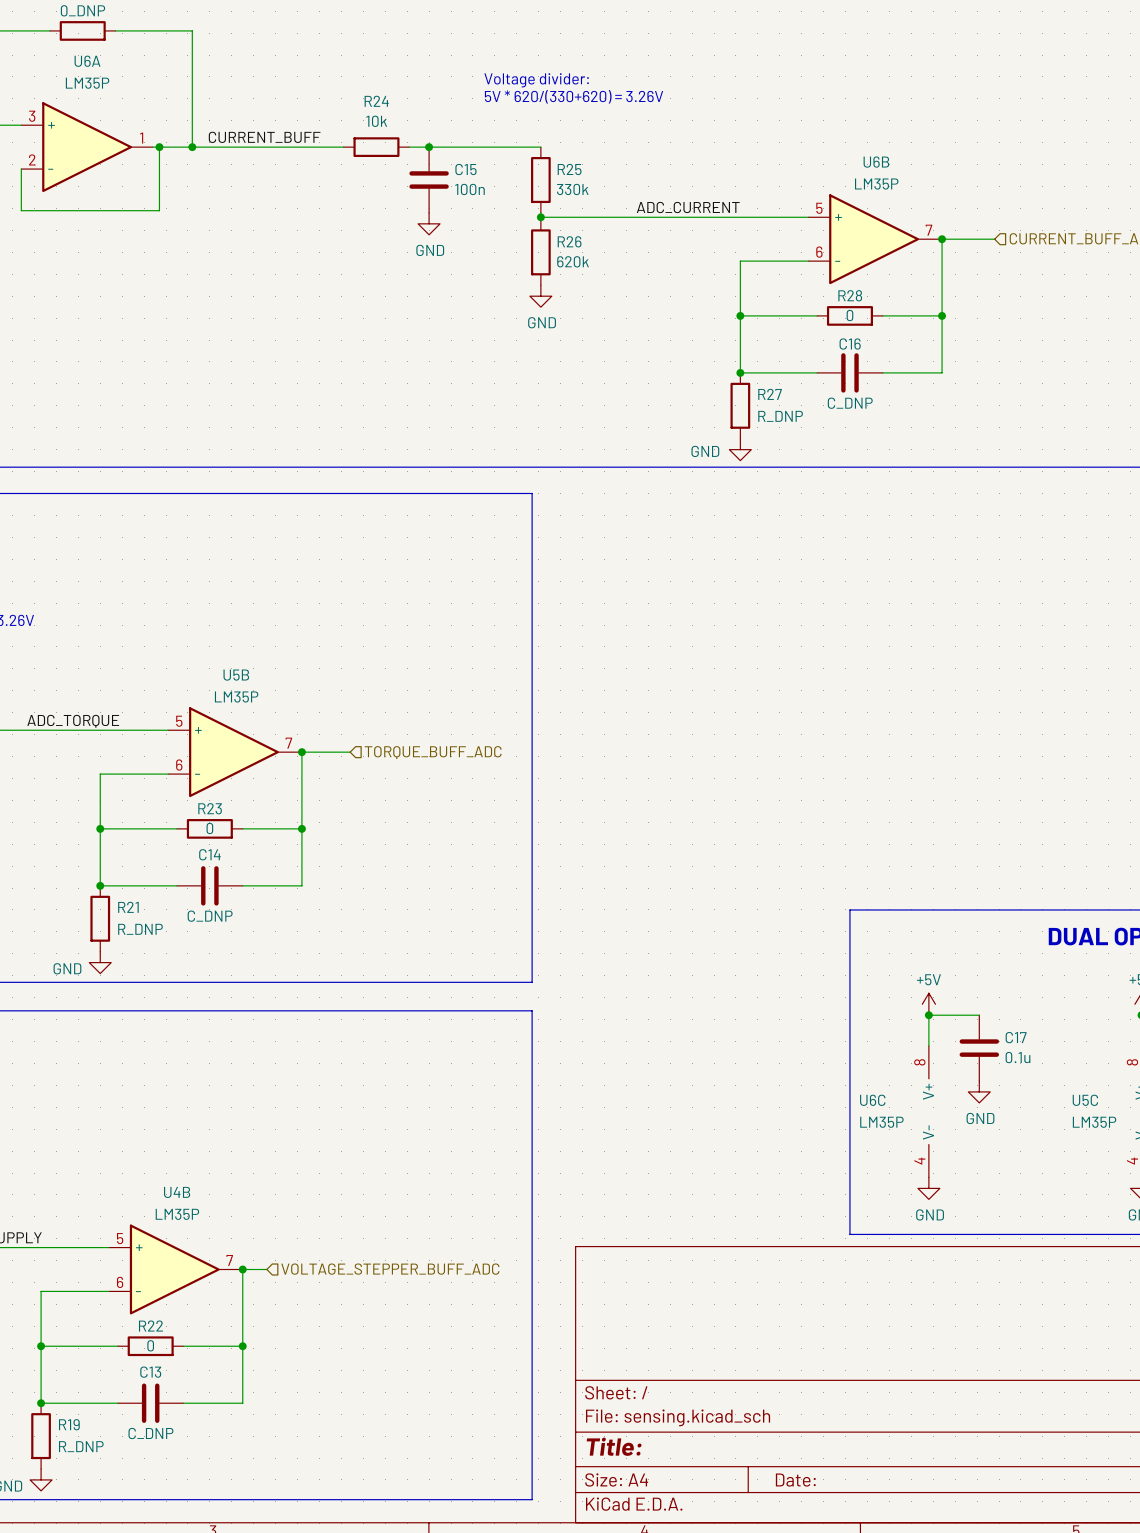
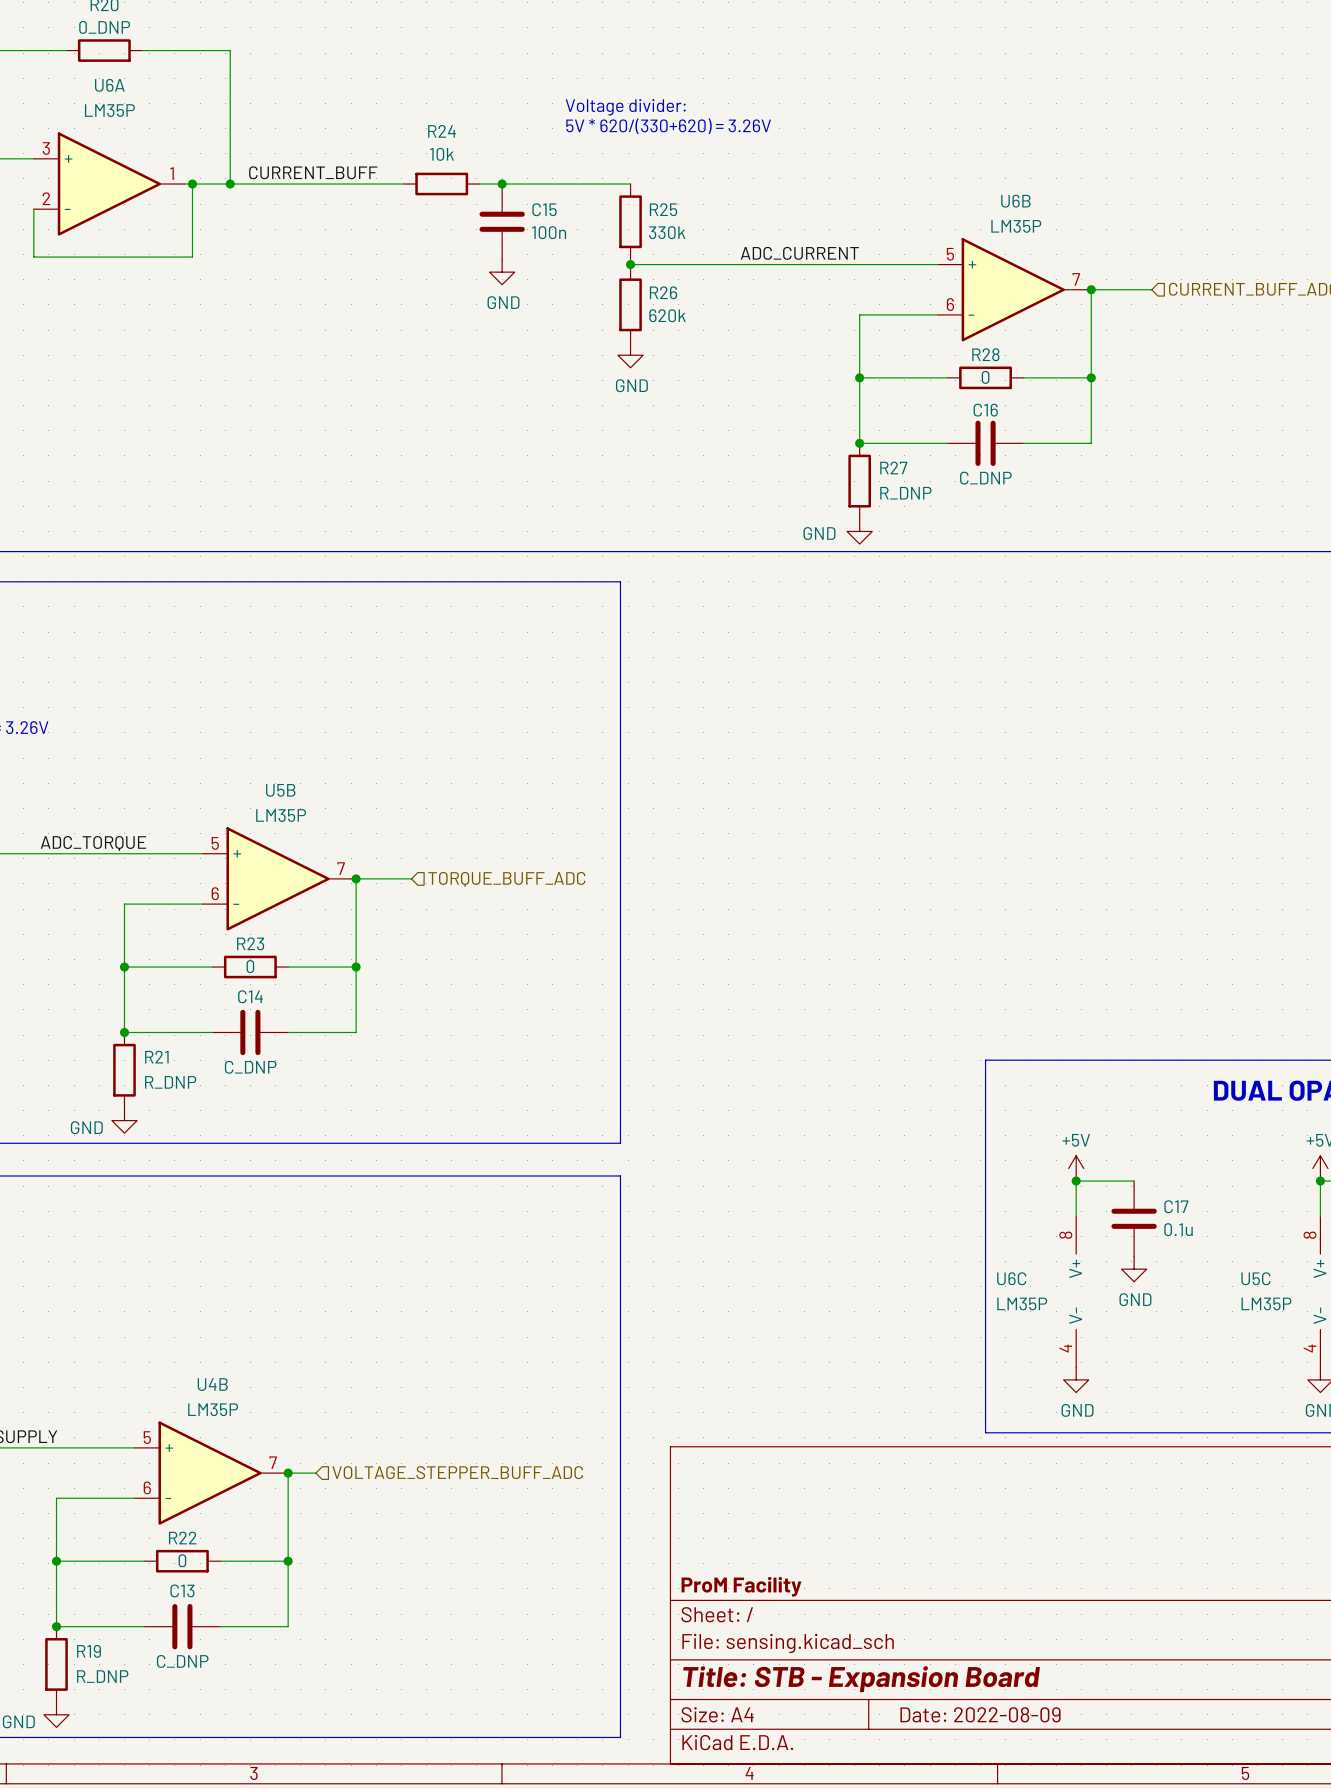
title block: none -> ProM Facility (741, 1586)
title block: Title: (614, 1446) -> Title: STB - Expansion Board (861, 1679)
title block: Date: (795, 1480) -> Date: 2022-08-09 (980, 1714)

